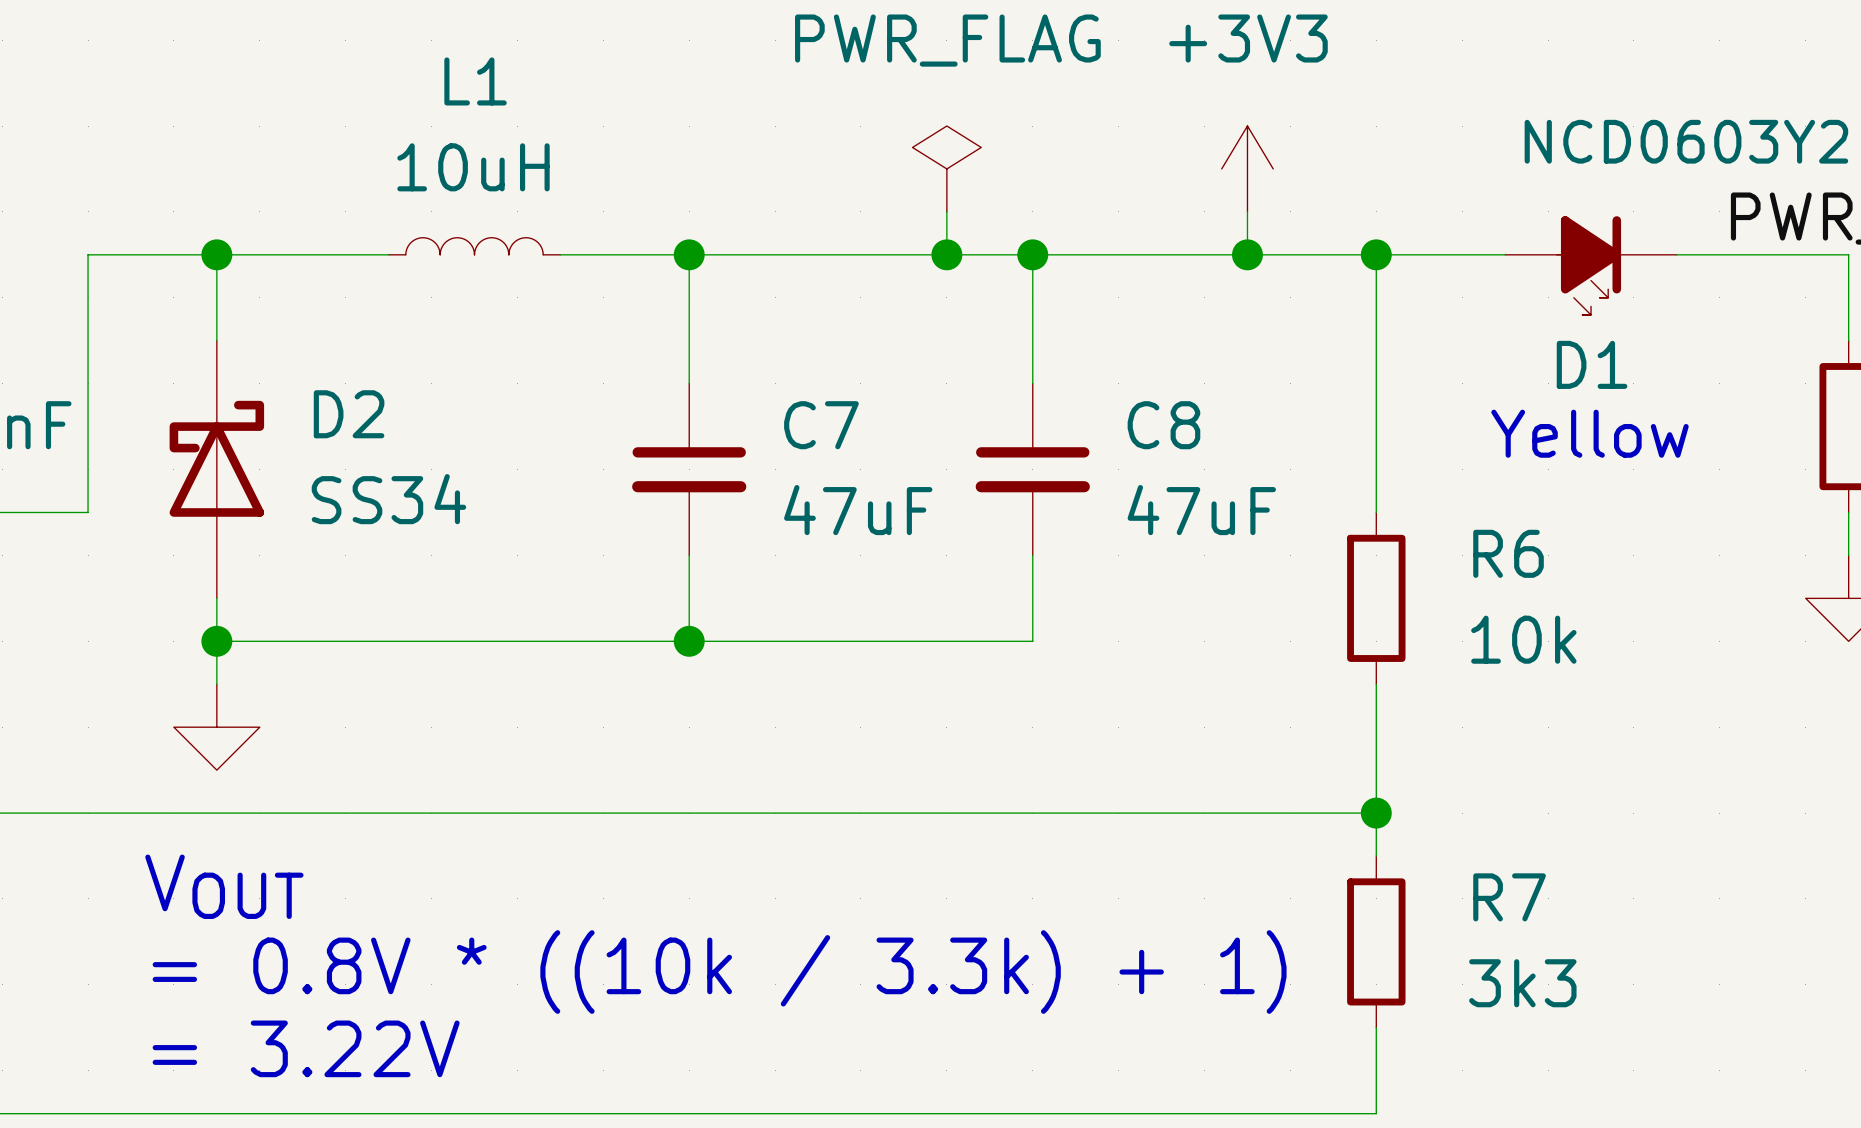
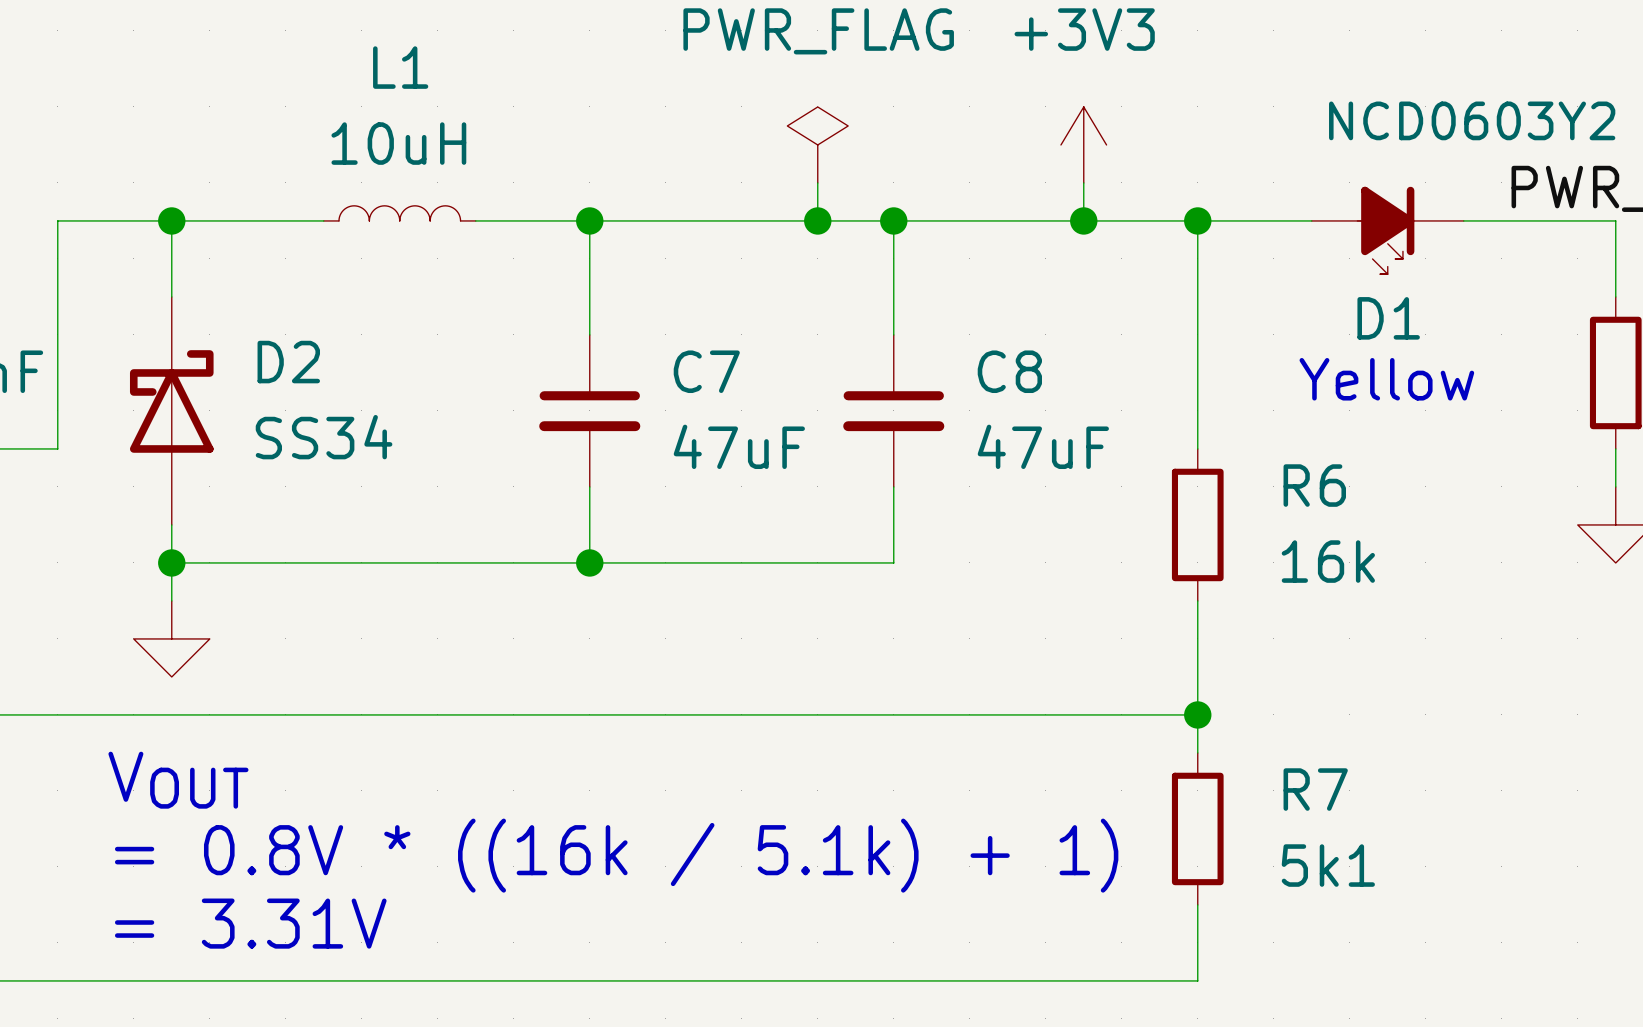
R6 value: 10k (1523, 639) -> 16k (1328, 561)
text: = 0.8V * ((10k / 3.3k) + 1) (719, 972) -> = 0.8V * ((16k / 5.1k) + 1) (616, 855)
R7 value: 3k3 (1522, 983) -> 5k1 (1328, 865)
text: = 3.22V (306, 1048) -> = 3.31V (250, 923)

